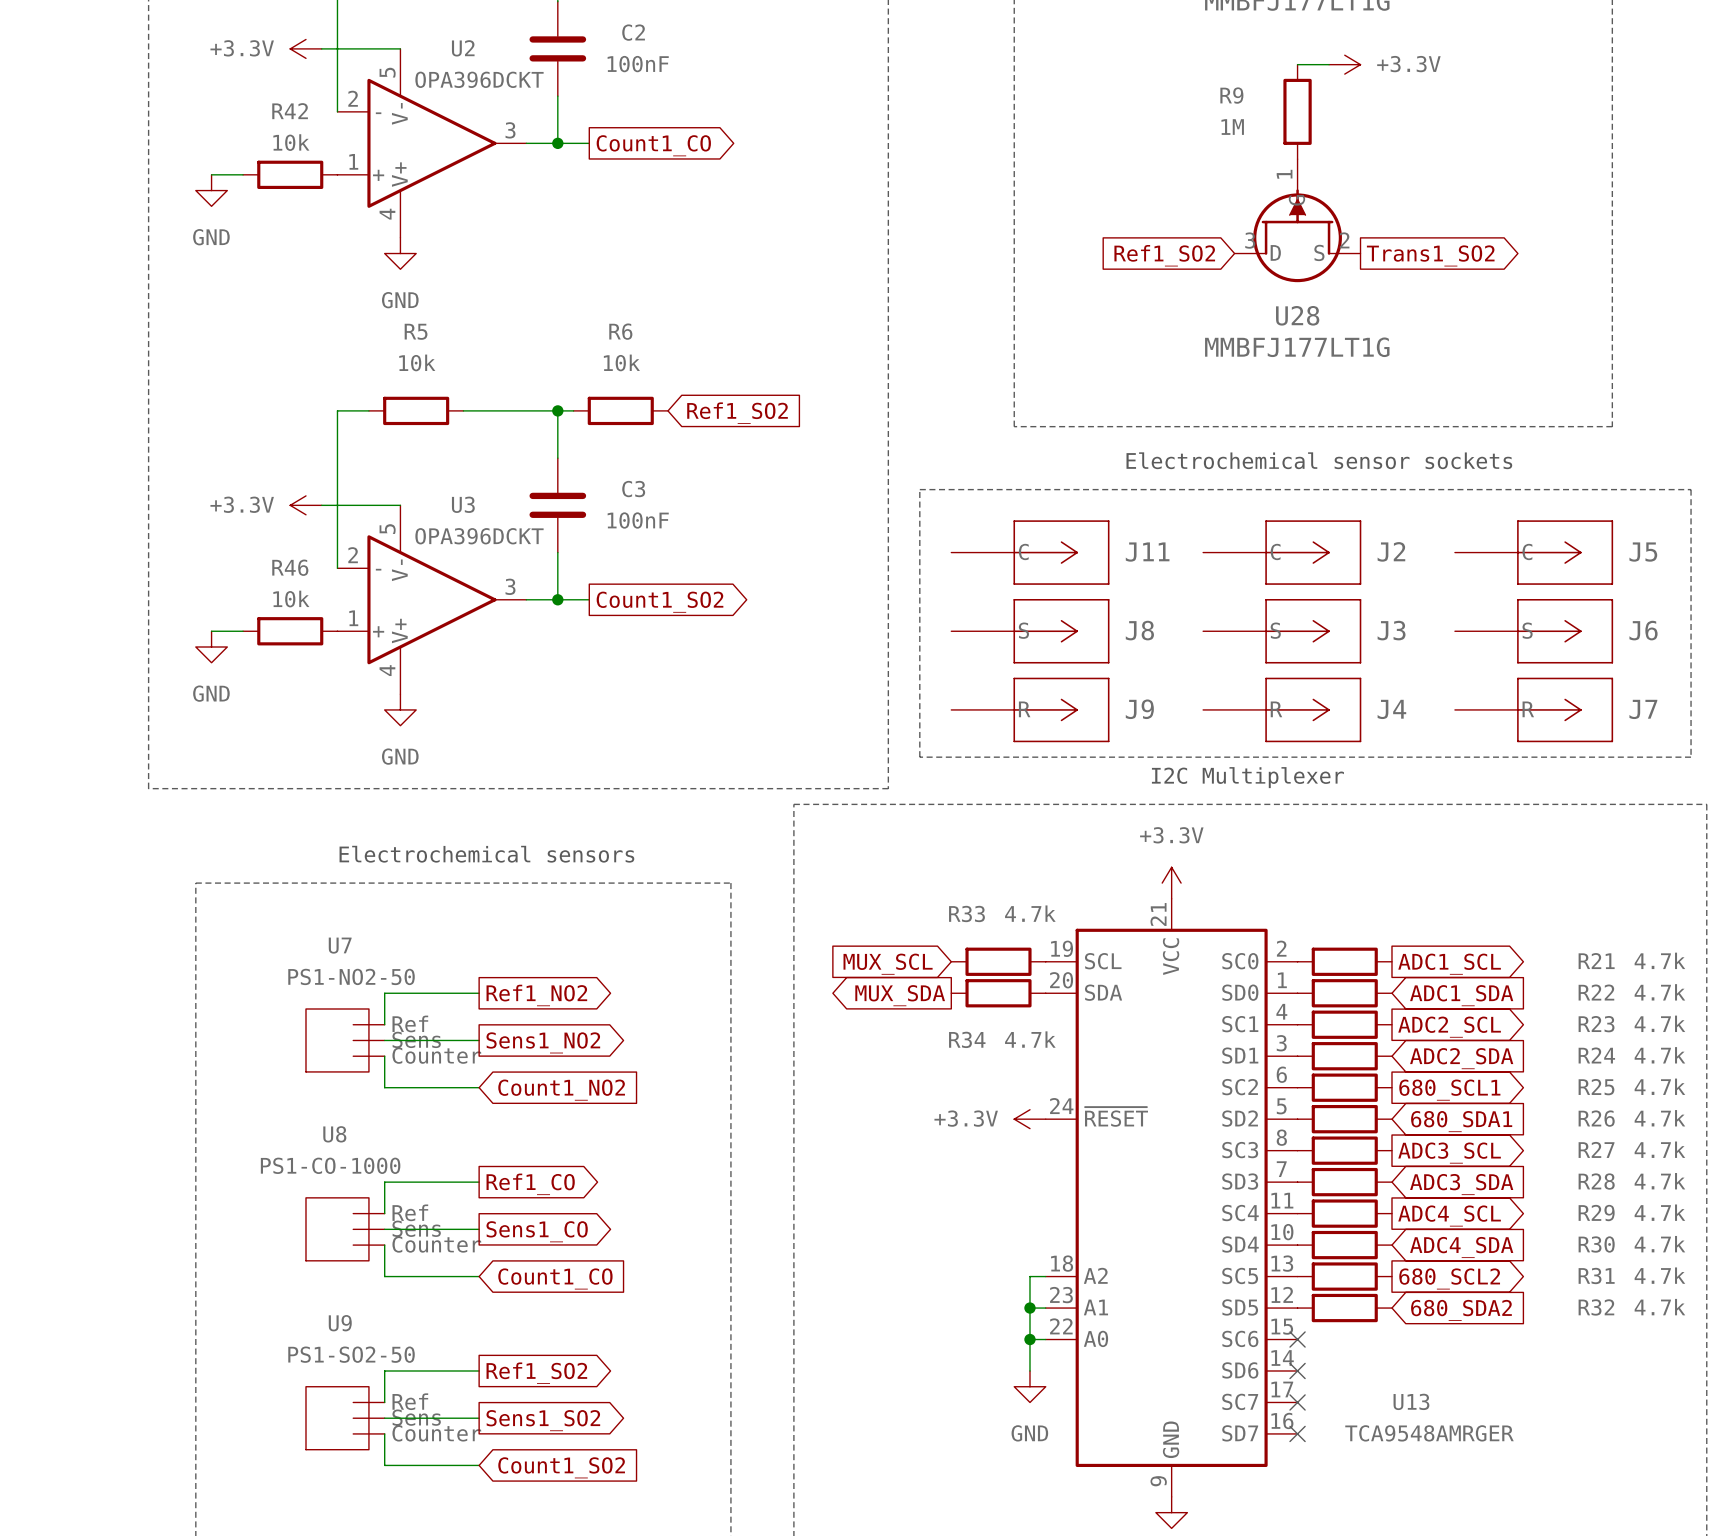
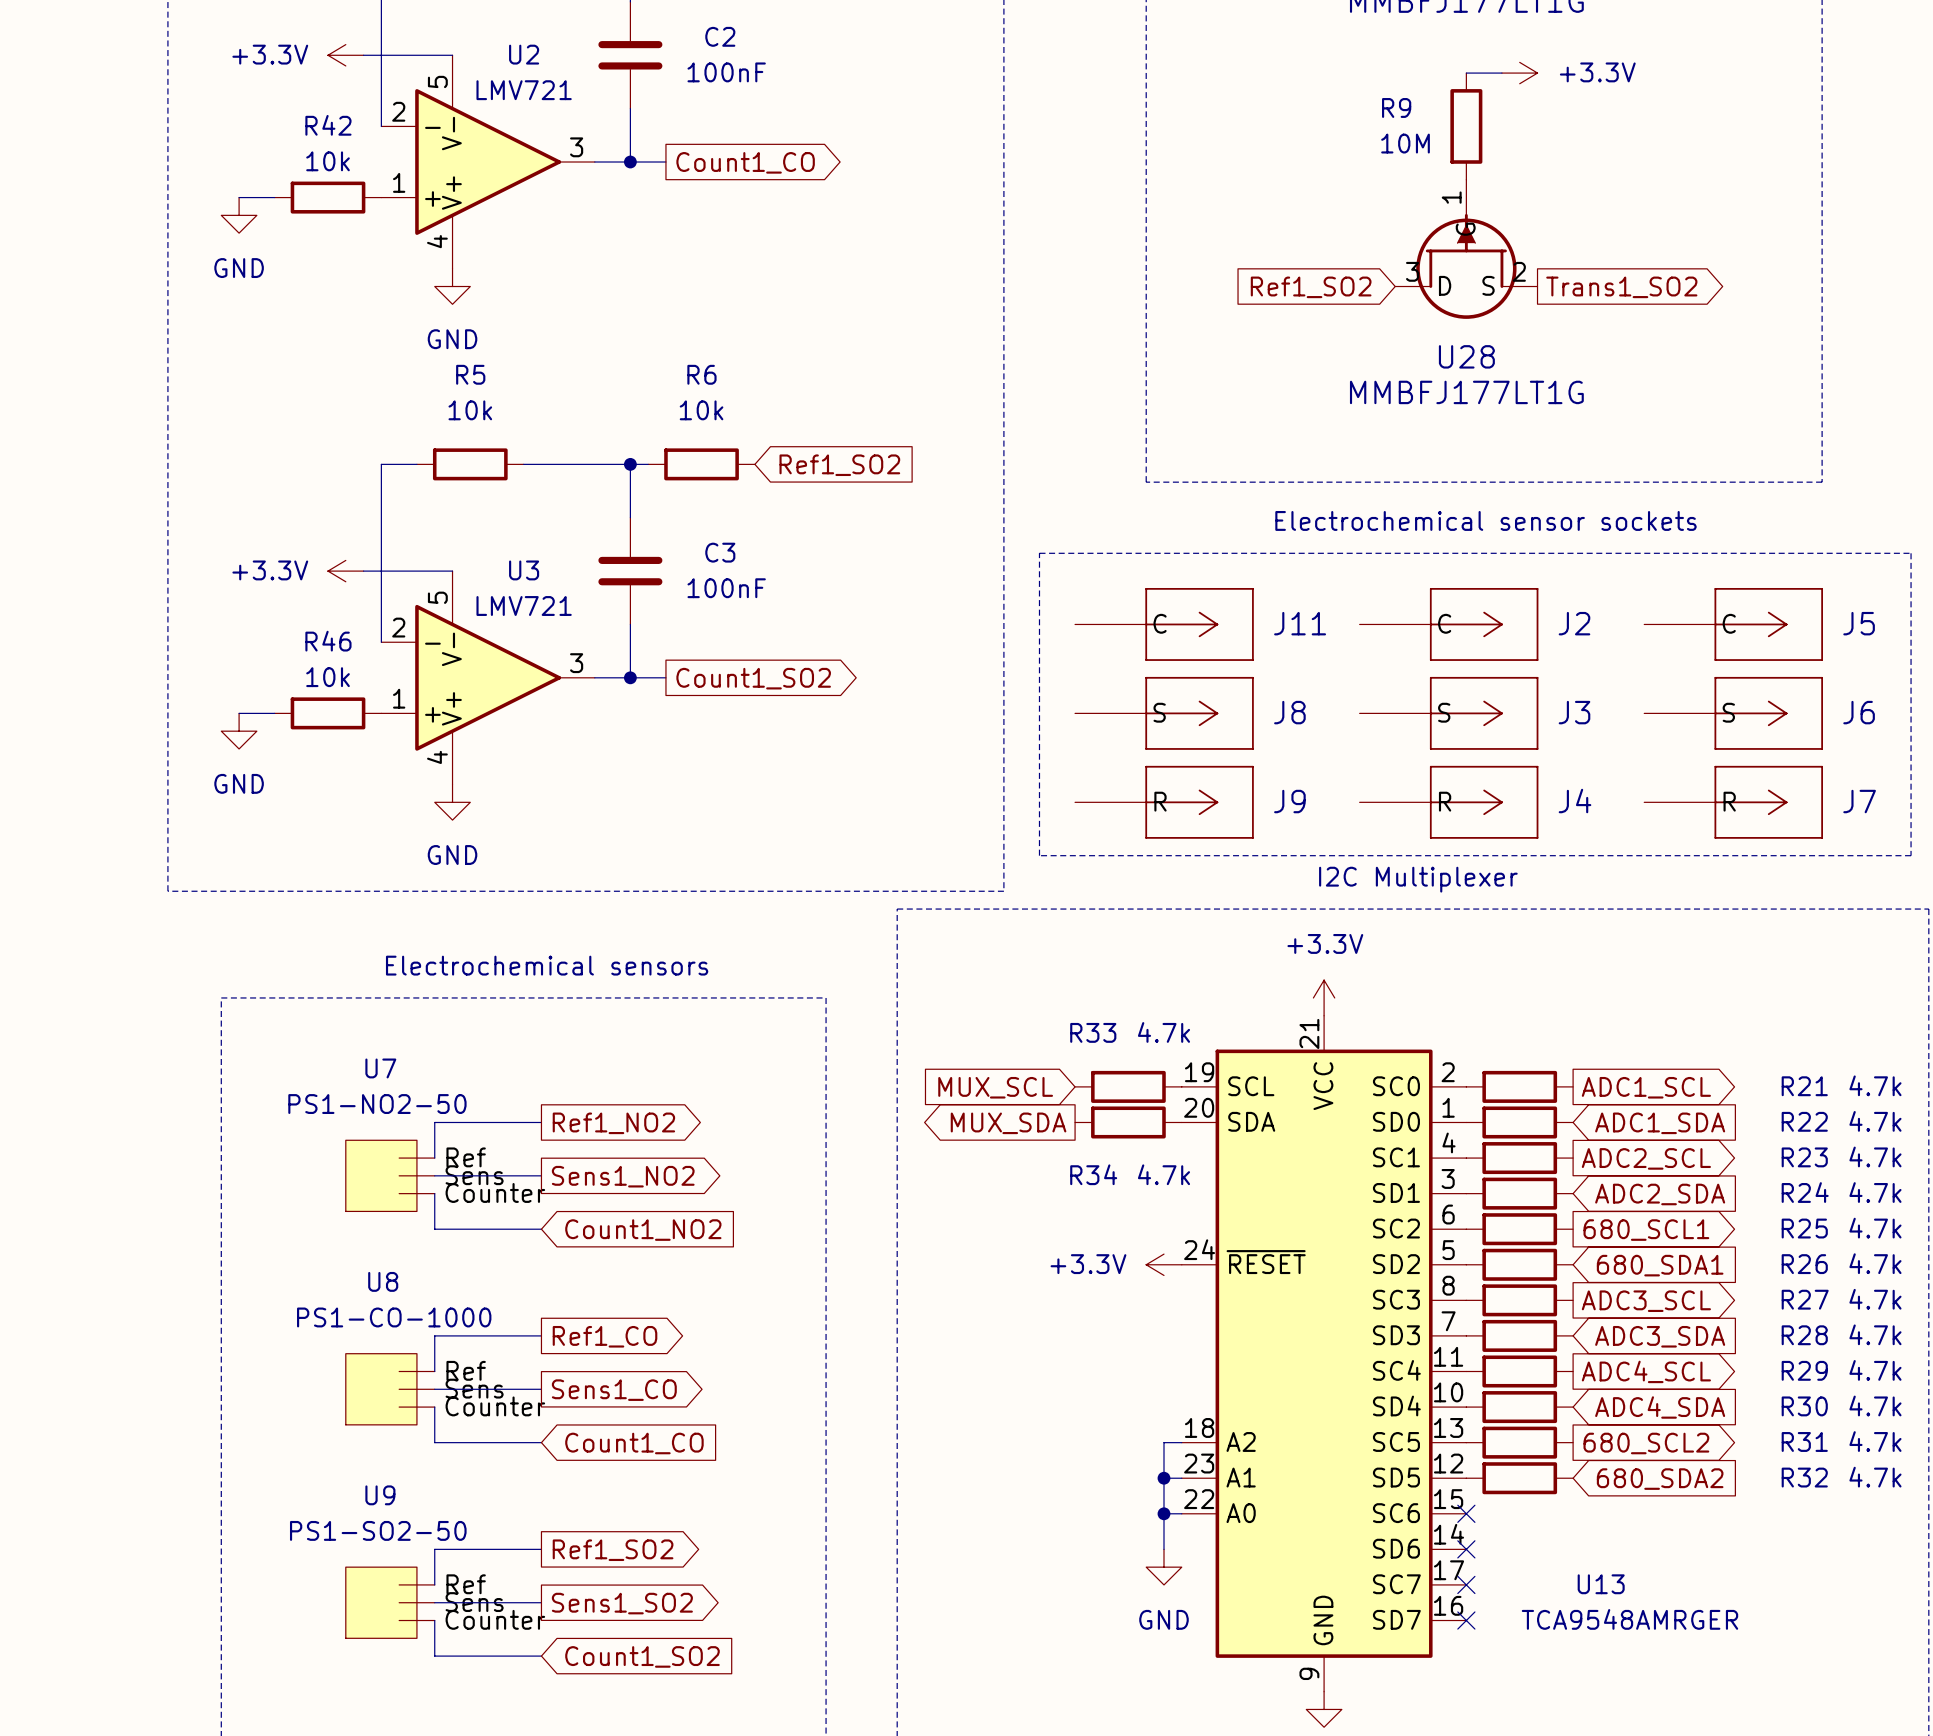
U2 value: OPA396DCKT (479, 79) -> LMV721 (524, 90)
R9 value: 1M (1232, 127) -> 10M (1405, 143)
U3 value: OPA396DCKT (479, 536) -> LMV721 (524, 606)

